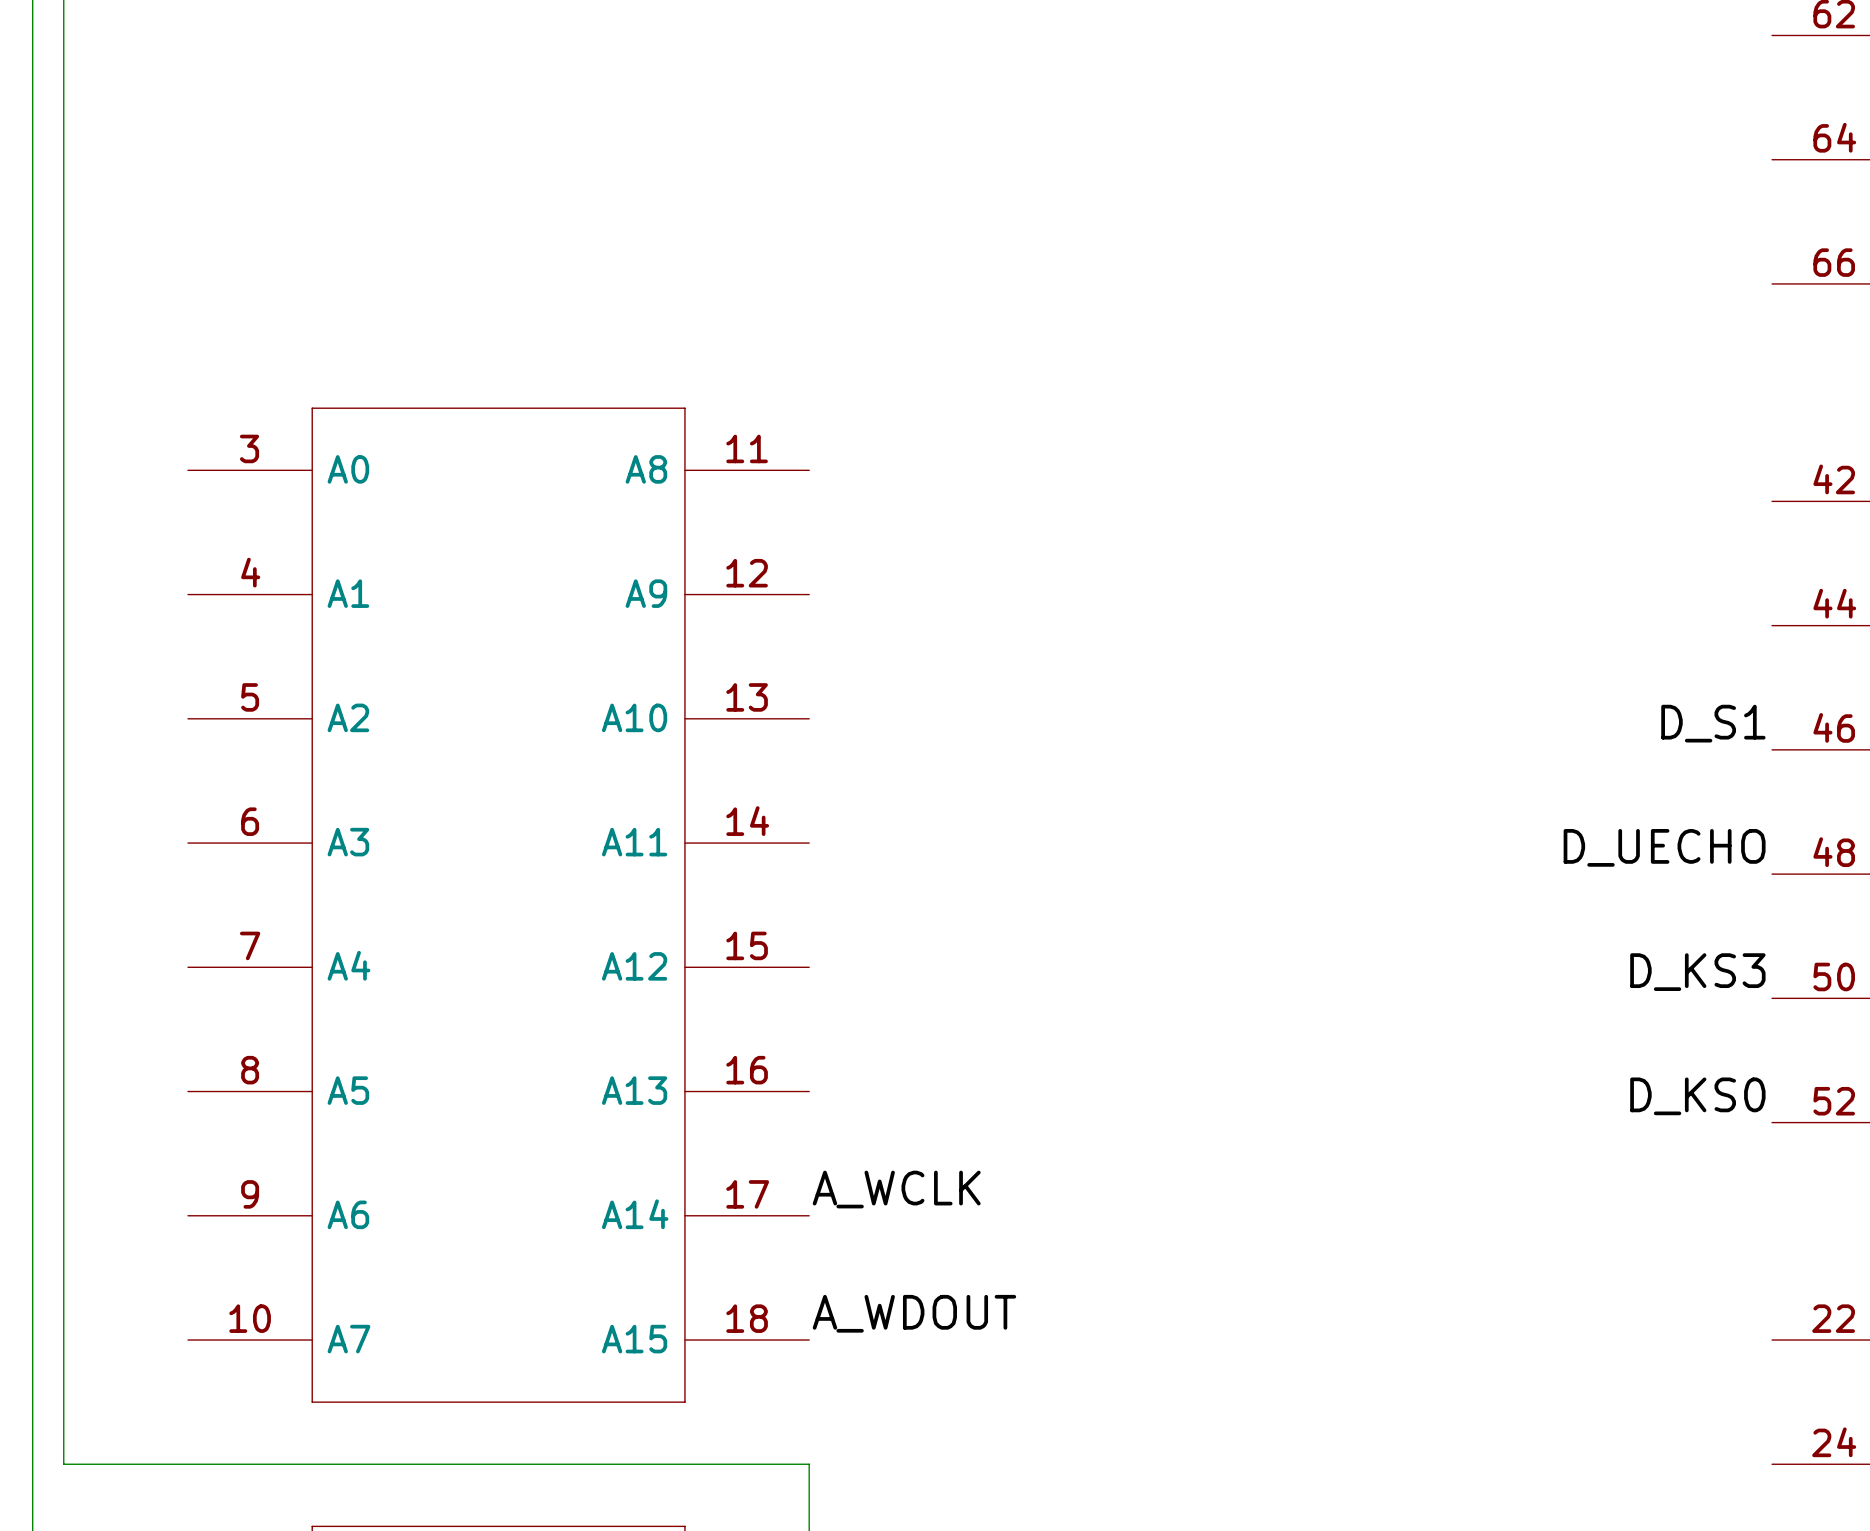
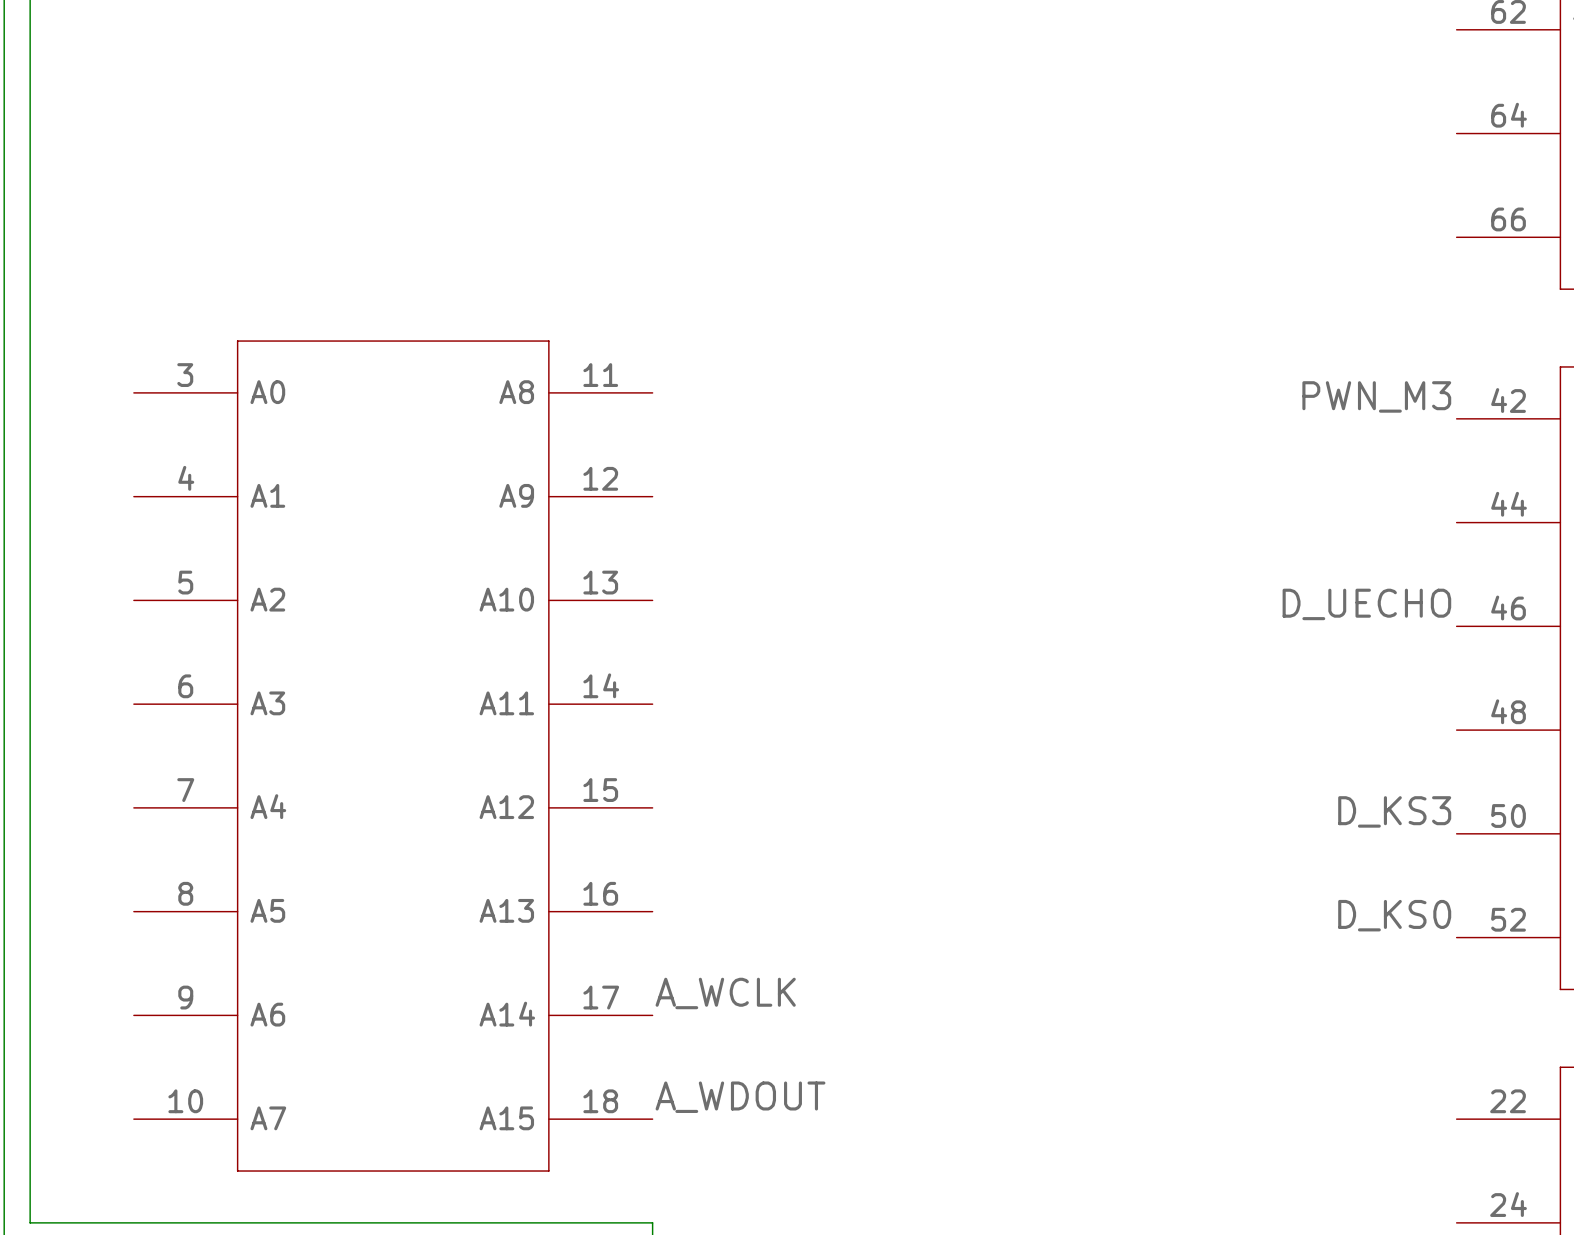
label: none -> PWN_M3 (1376, 396)
label: D_S1 (1713, 723) -> D_UECHO (1366, 604)
label: D_UECHO (1664, 847) -> none

